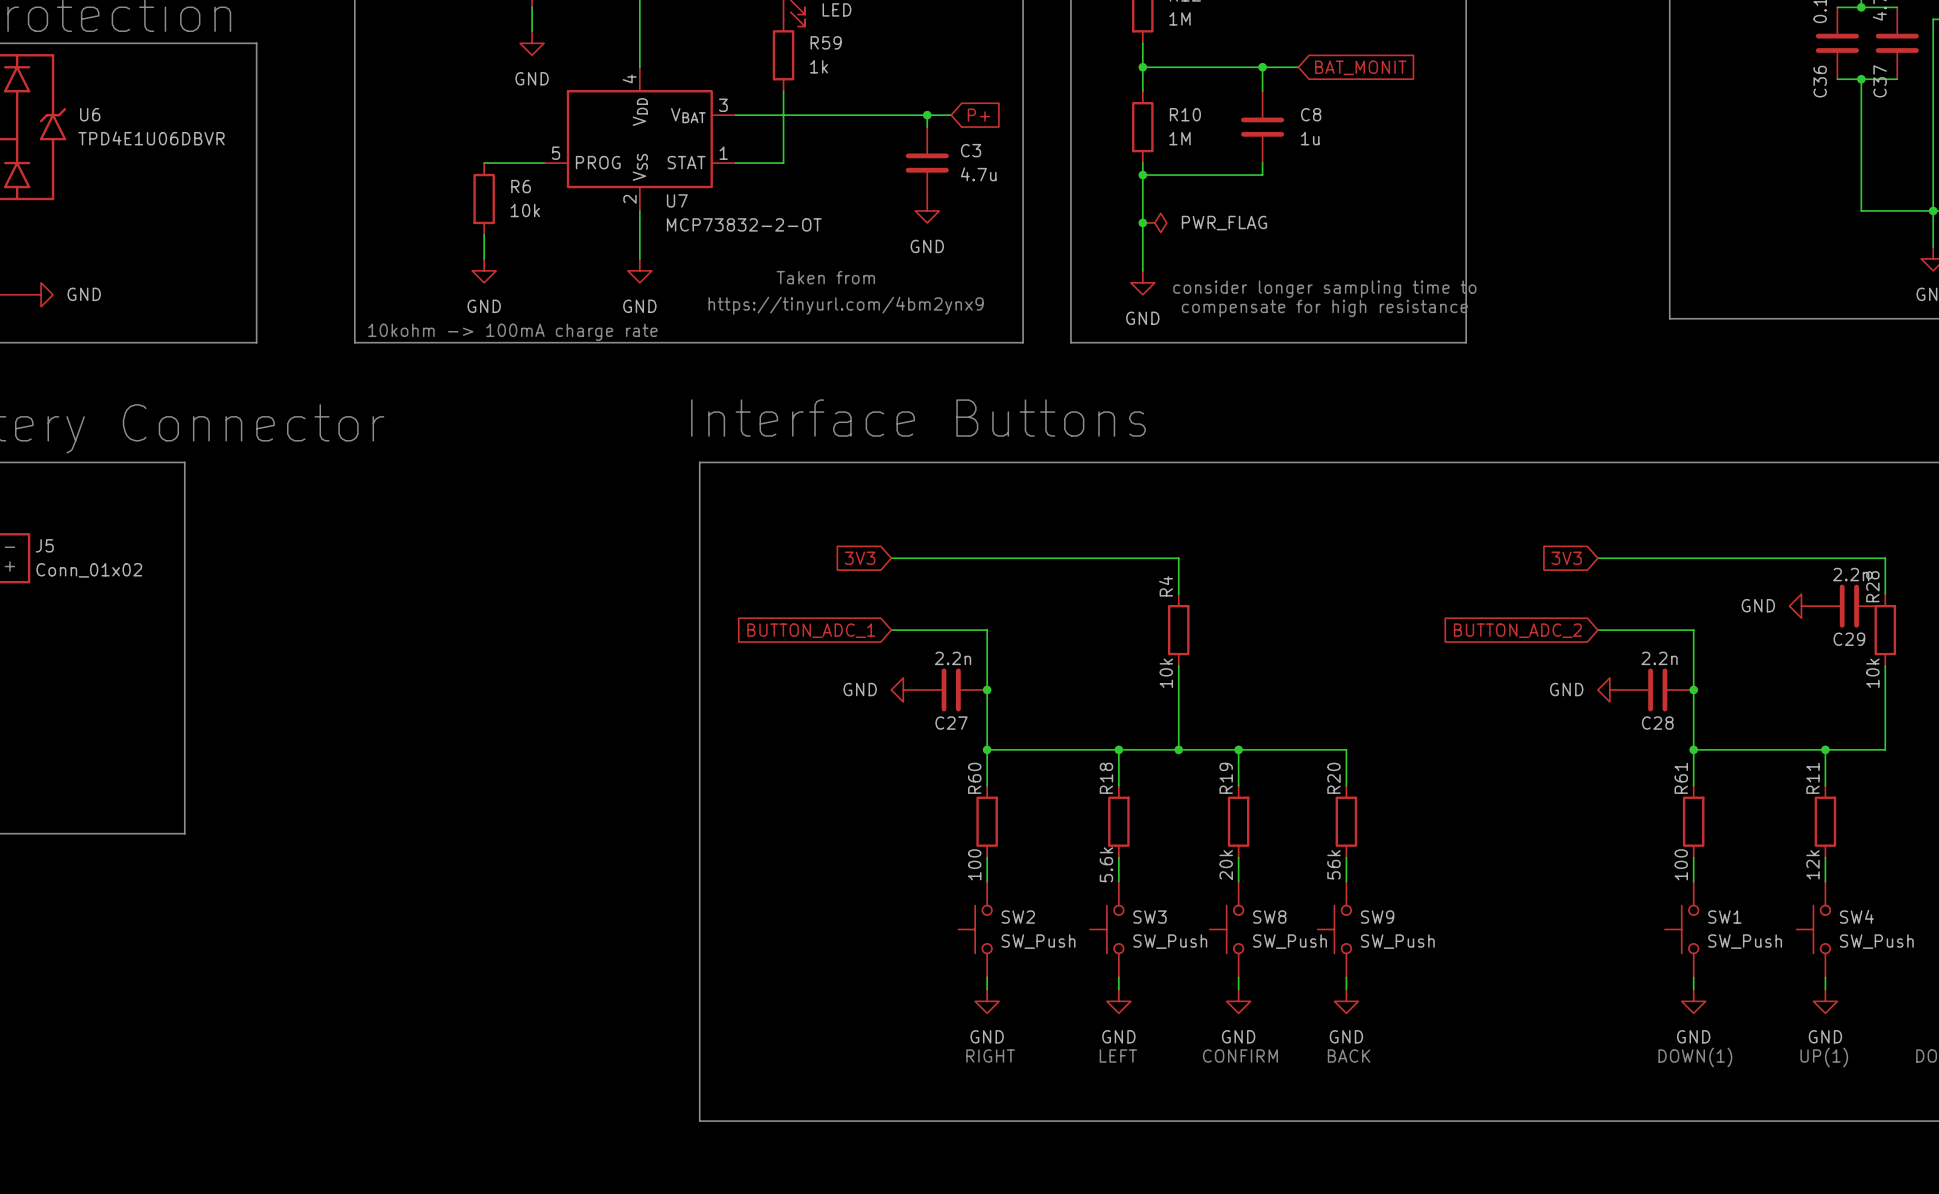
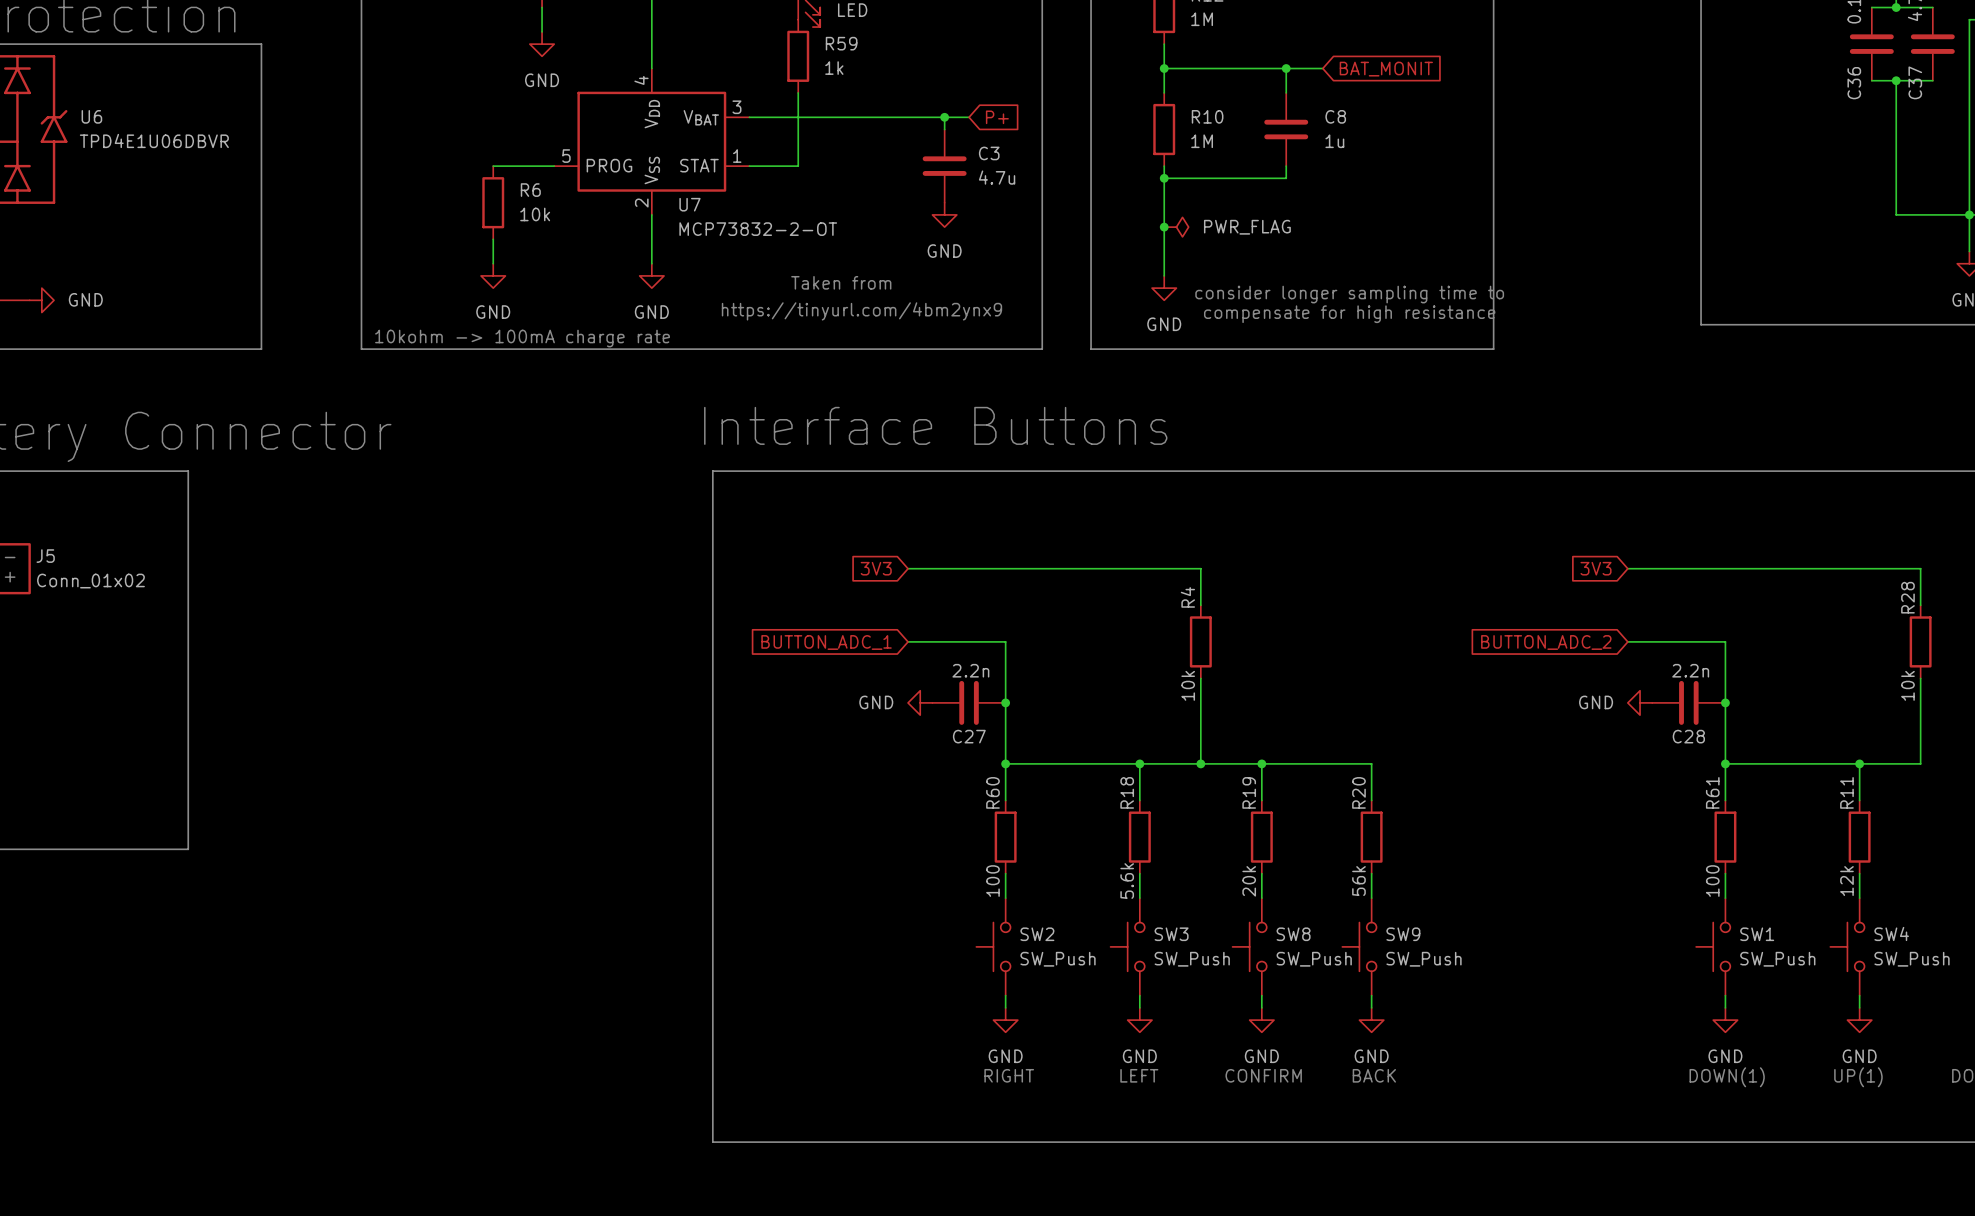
power symbol: GND (1801, 606) -> none
C29: 2.2n (1849, 606) -> none

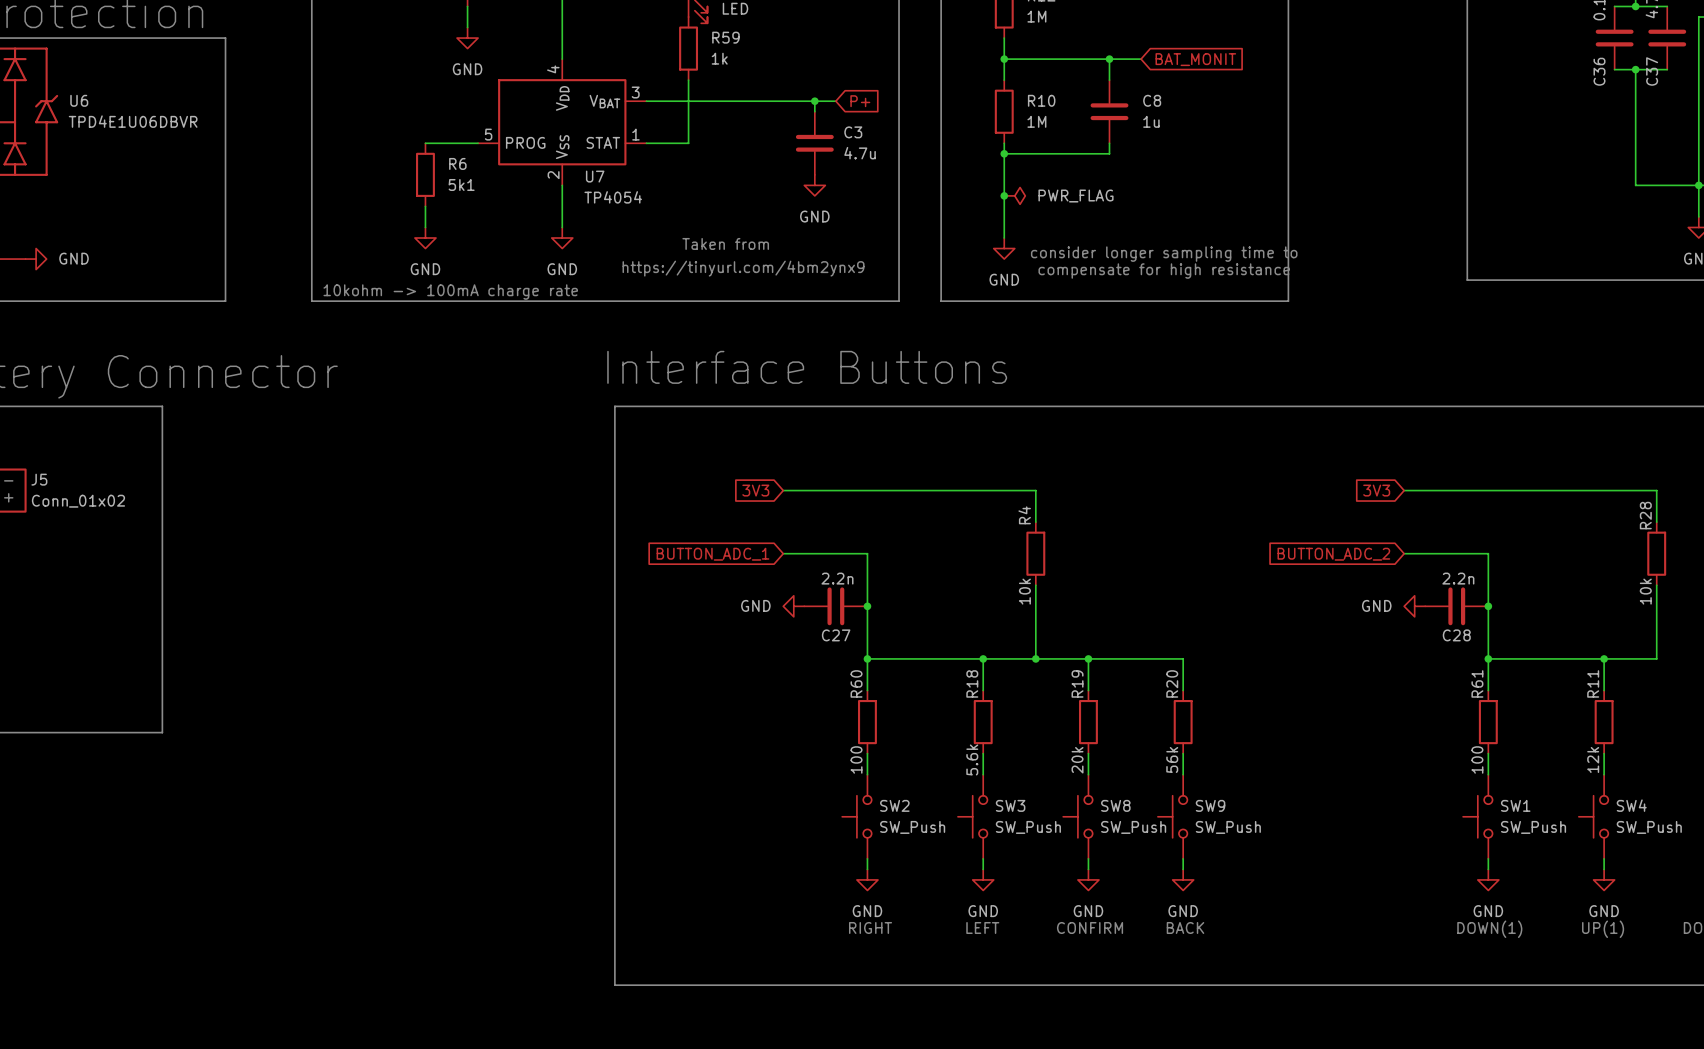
R6 value: 10k (535, 214) -> 5k1 (461, 184)
U7 value: MCP73832-2-OT (758, 229) -> TP4054 (613, 197)

